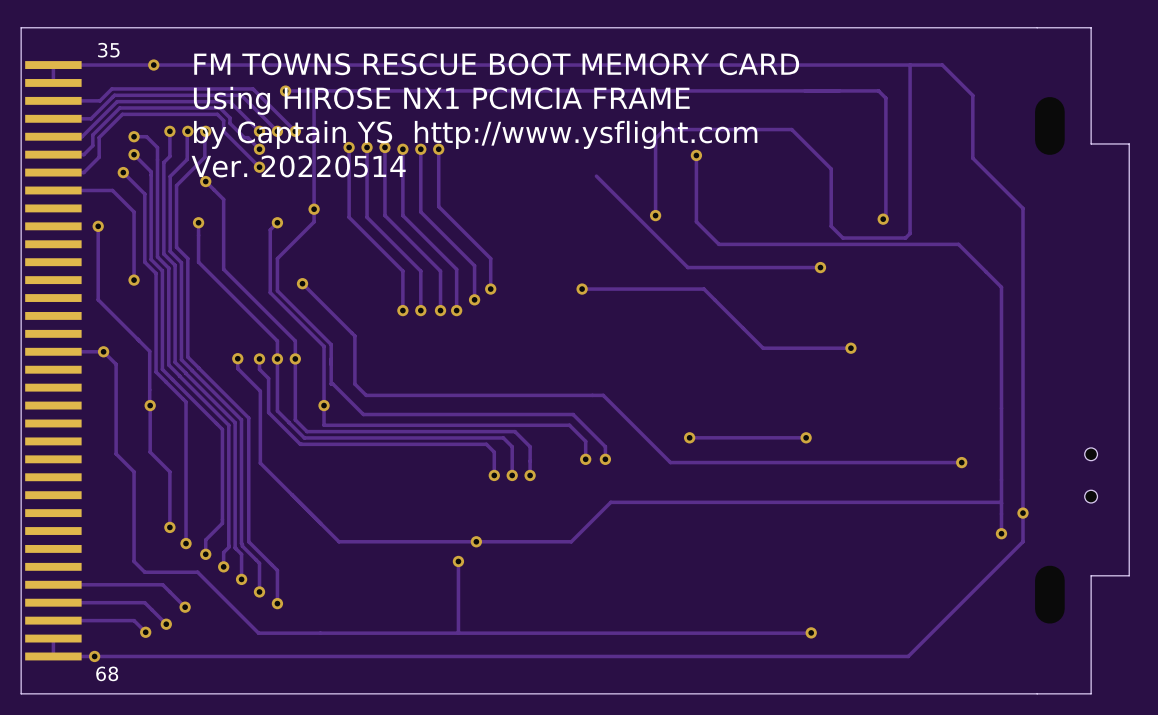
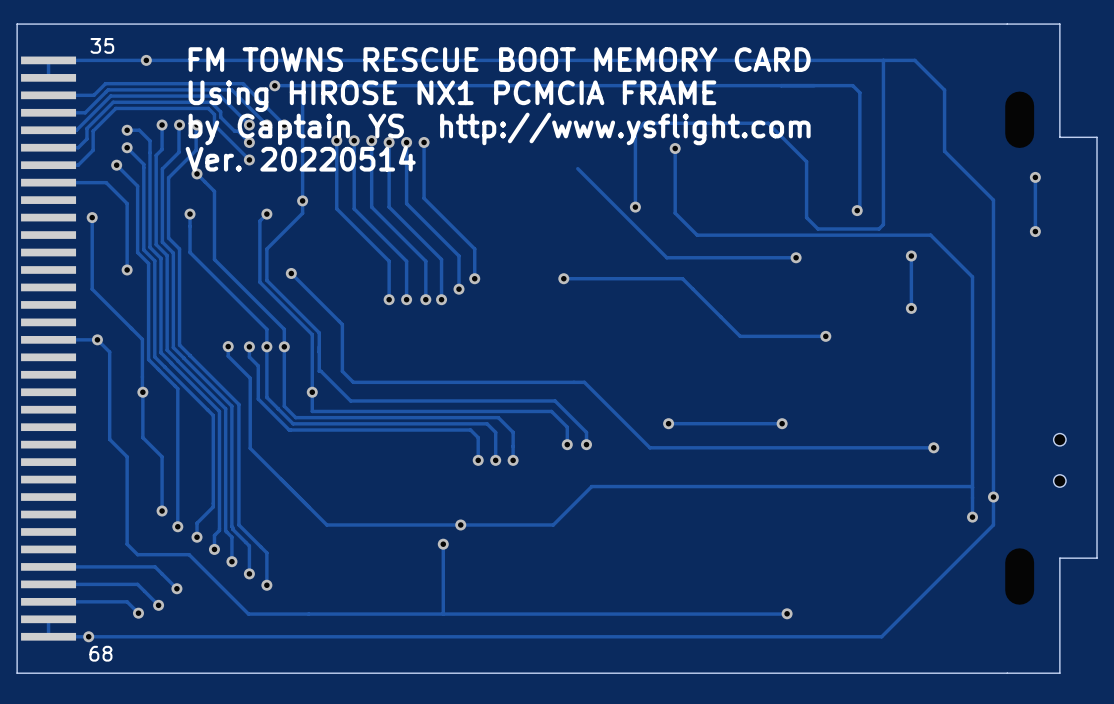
track: none -> (1035, 177) (1035, 231)
via: none -> (1035, 177)
via: none -> (1035, 231)
track: none -> (911, 256) (911, 308)
via: none -> (911, 256)
via: none -> (911, 308)

